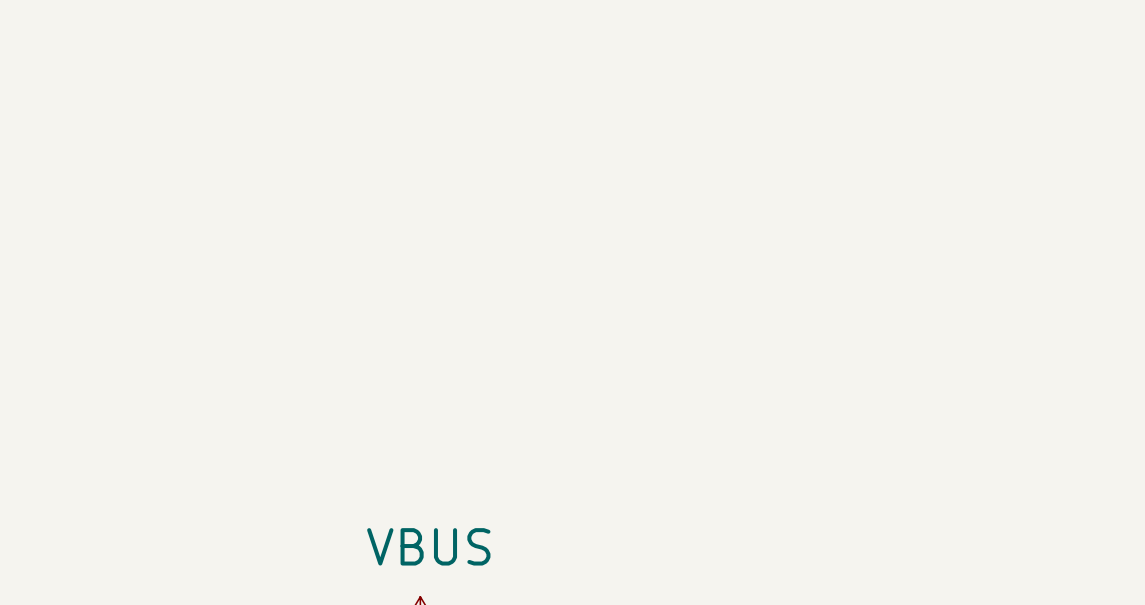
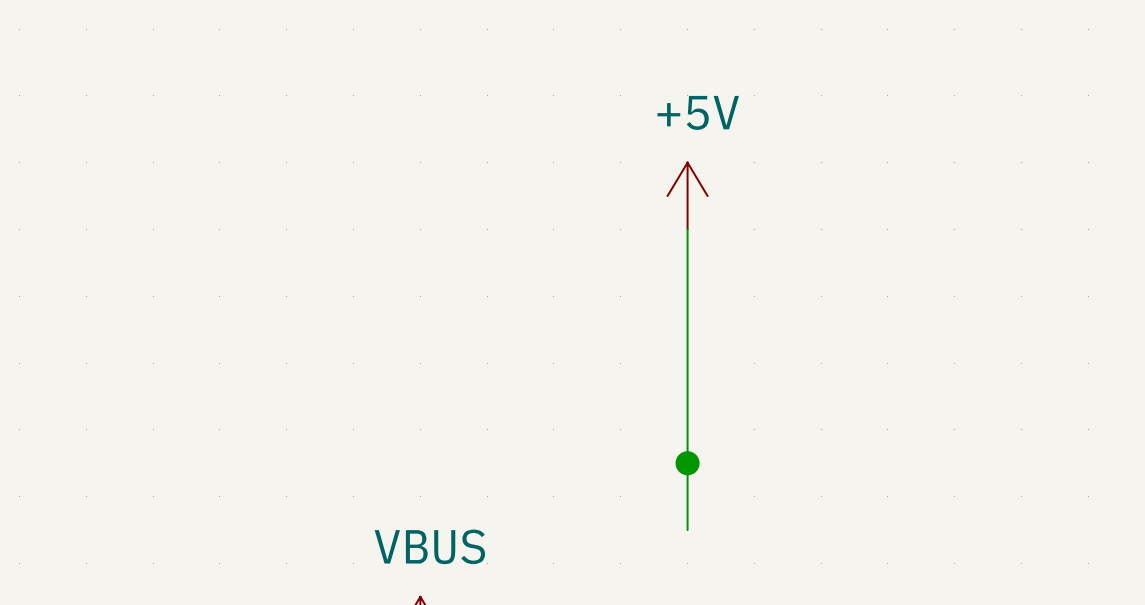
power symbol: none -> +5V (687, 196)
wire: none -> (687, 229) (687, 530)
junction: none -> (687, 463)

